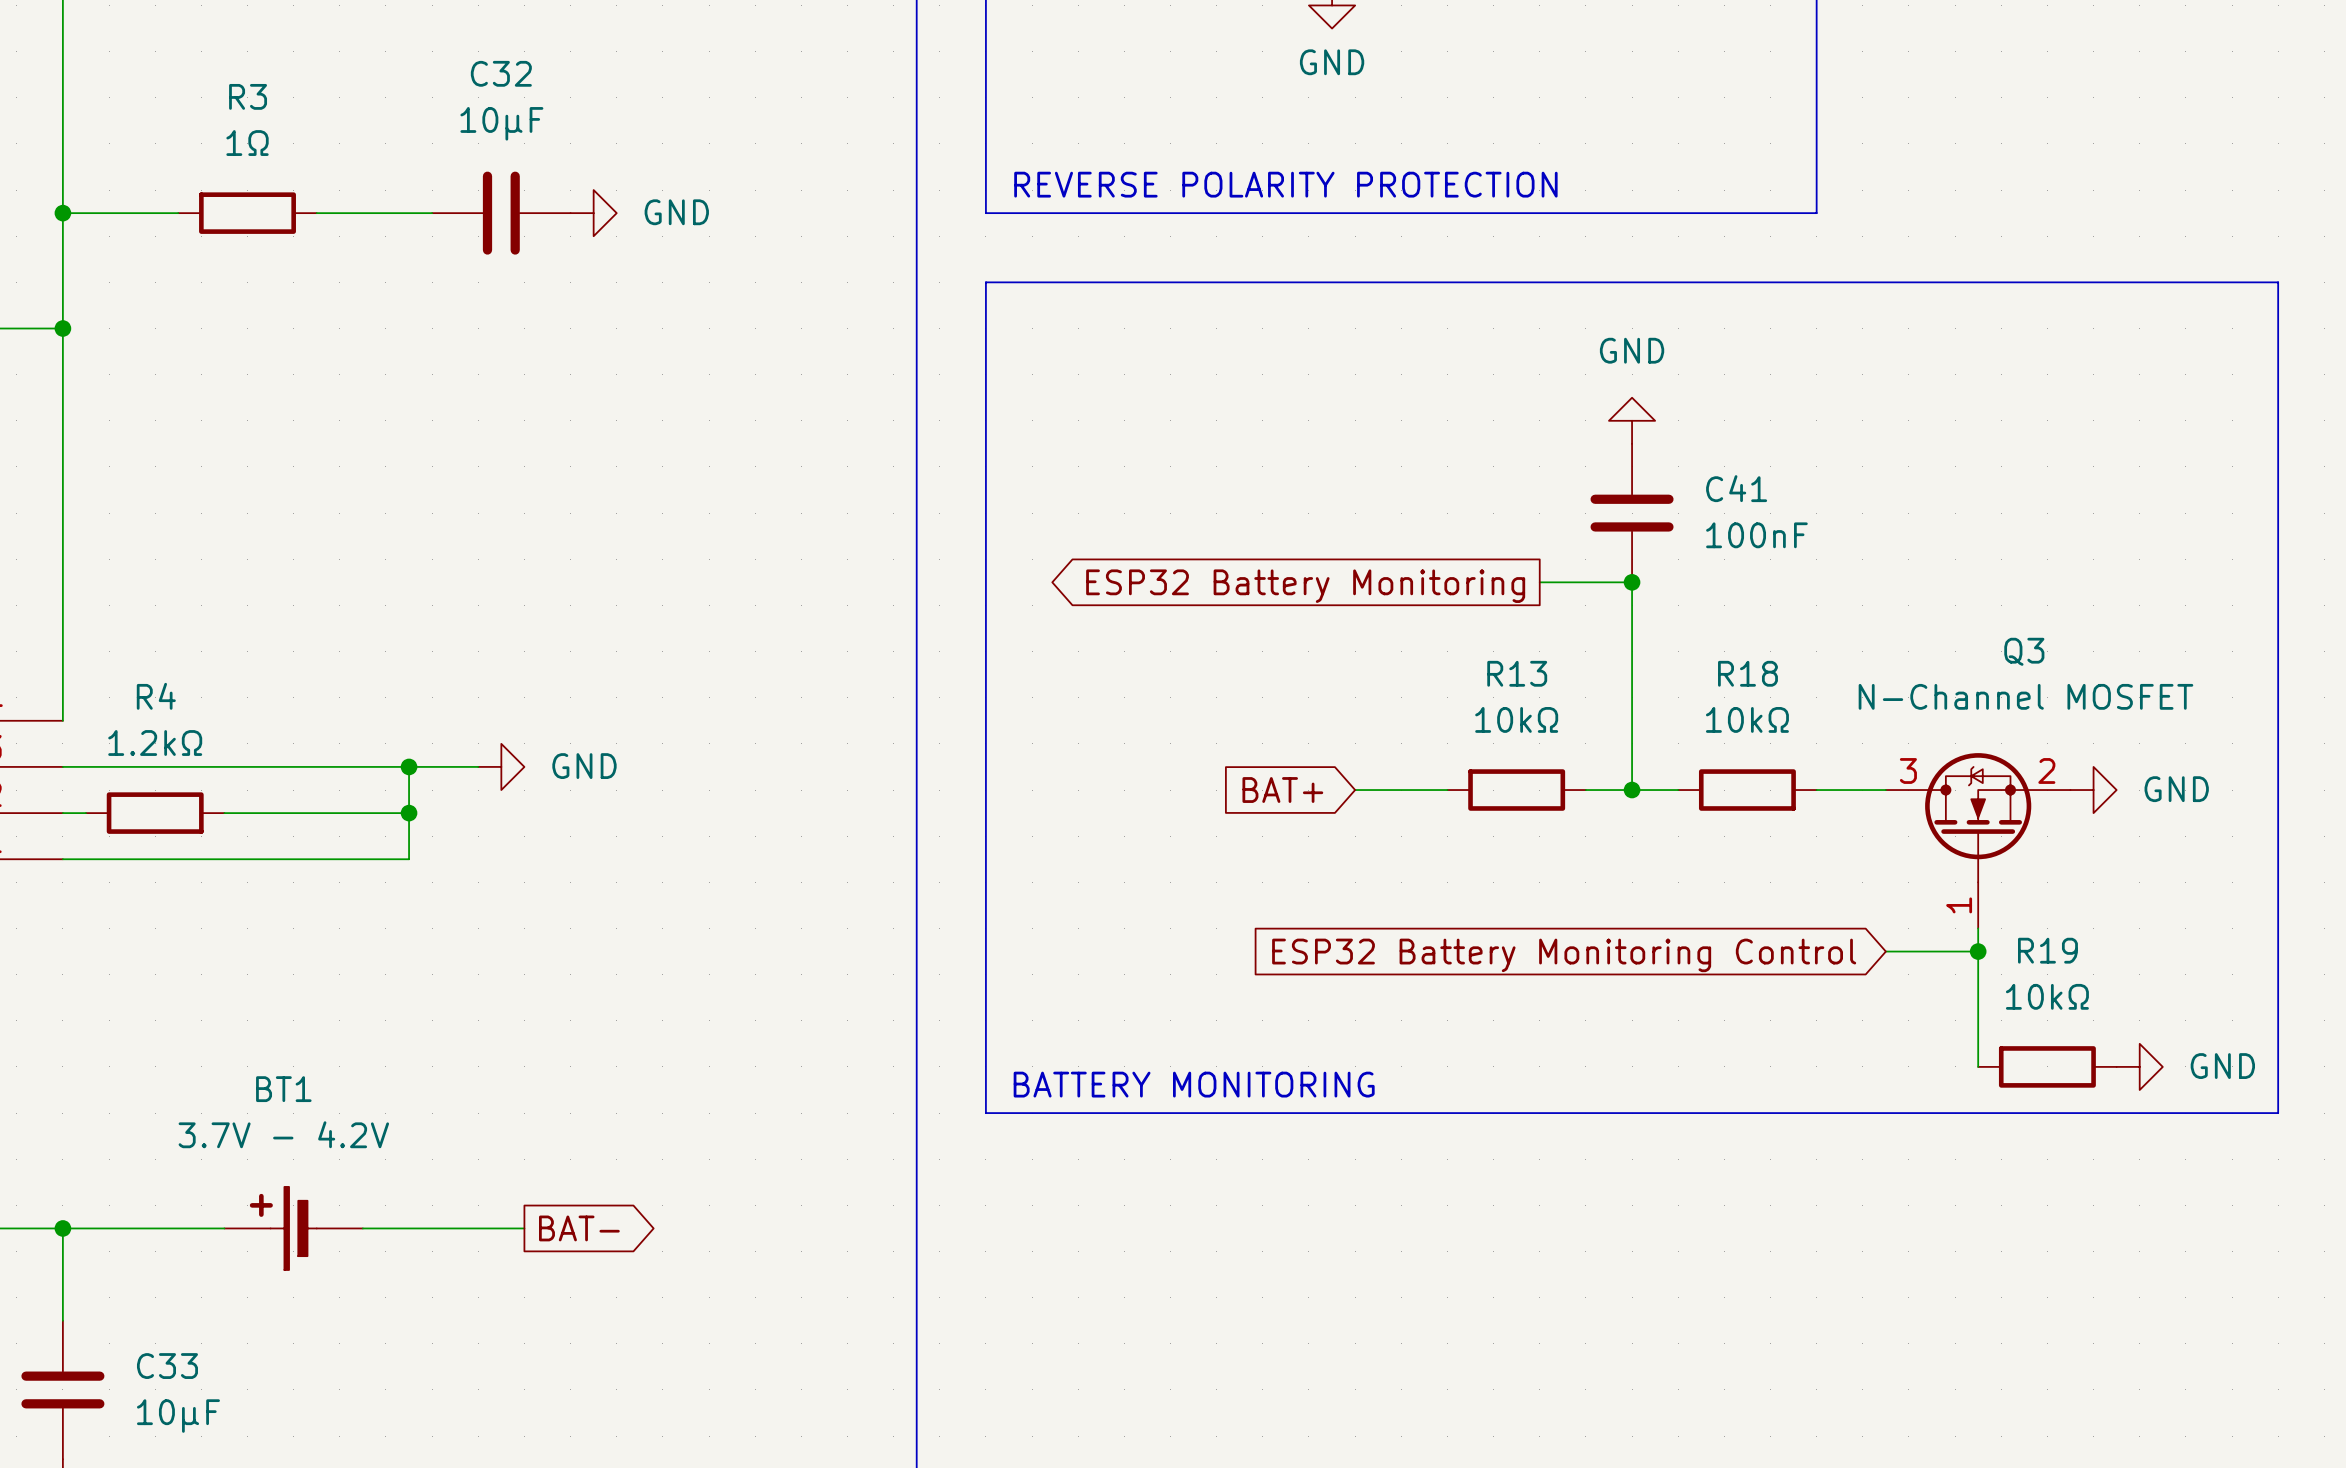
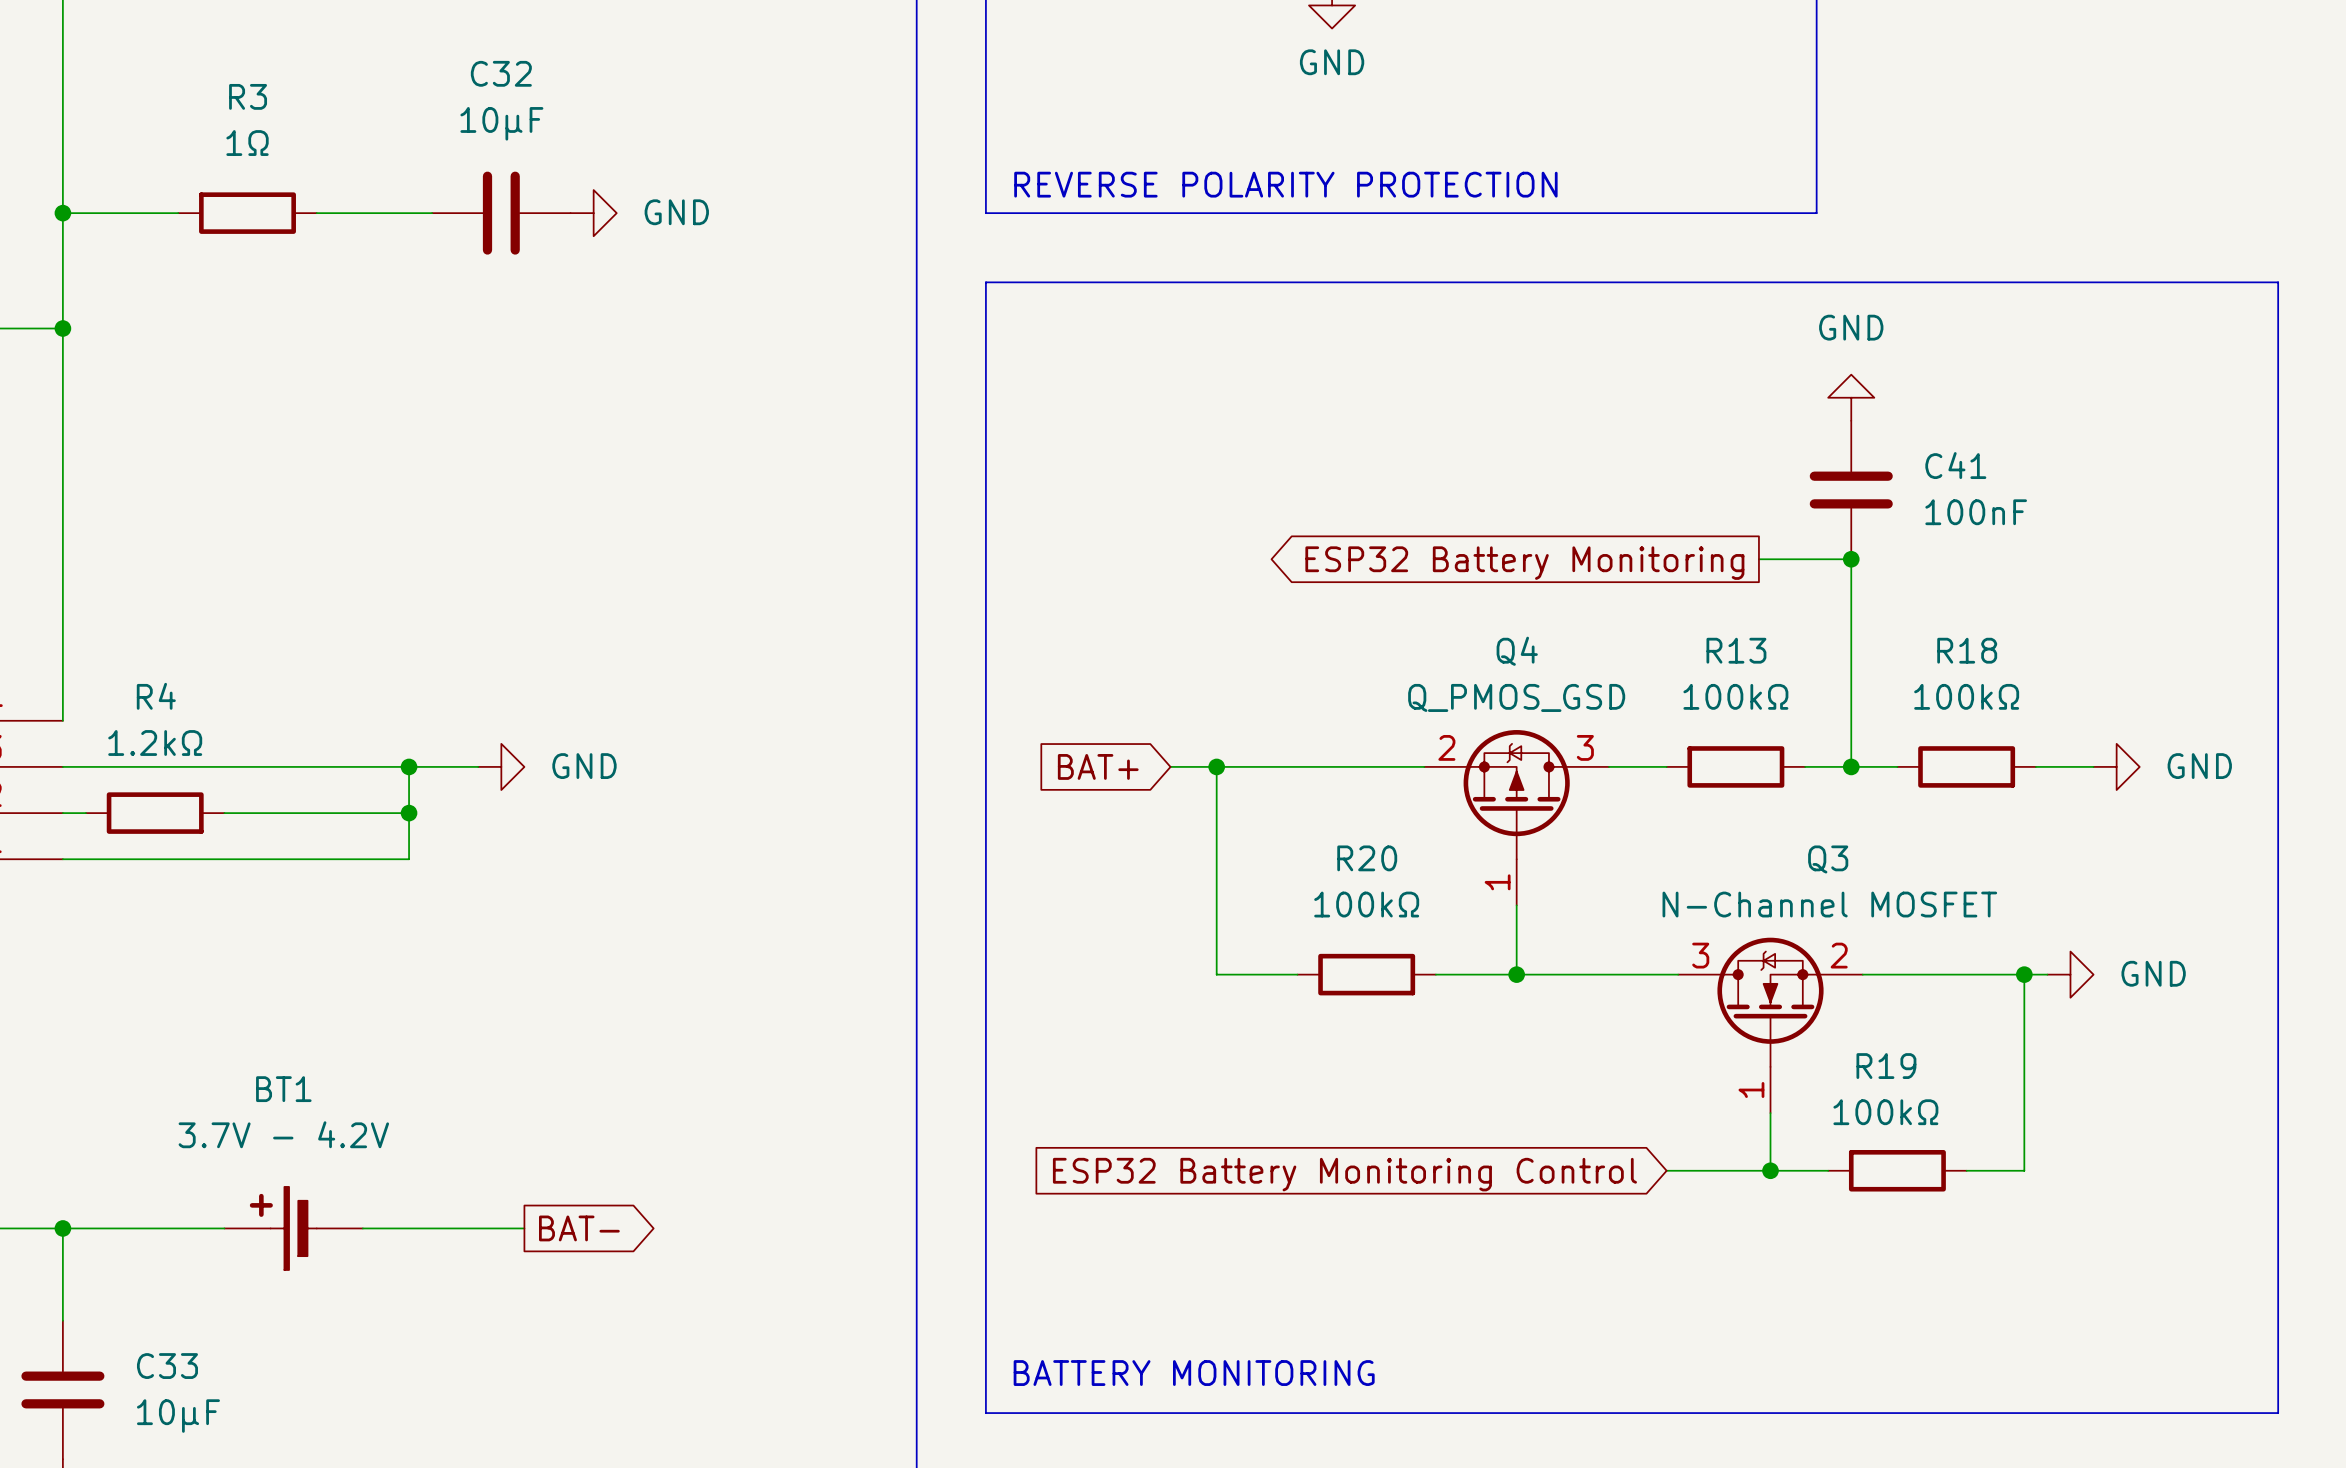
power symbol position: GND (1632, 420) -> GND (1851, 397)
C41 position: (1632, 513) -> (1851, 490)
junction: none -> (1851, 559)
wire: (1539, 582) (1632, 582) (1632, 790) -> (1758, 559) (1851, 559) (1851, 766)
junction: (1632, 582) -> none
global label position: ESP32 Battery Monitoring (1305, 586) -> ESP32 Battery Monitoring (1524, 563)
Q3 name position: Q3 (2024, 651) -> Q3 (1828, 859)
Q3 value position: N-Channel MOSFET (2025, 696) -> N-Channel MOSFET (1829, 904)
R13 value: 10kΩ (1516, 719) -> 100kΩ (1735, 696)
R18 value: 10kΩ (1747, 719) -> 100kΩ (1966, 696)
wire: none -> (1170, 766) (1424, 766)
wire: none -> (1216, 766) (1216, 974) (1297, 974)
junction: none -> (1216, 766)
wire: none -> (1608, 766) (1666, 766)
junction: none -> (1851, 766)
wire: none -> (2035, 766) (2093, 766)
global label position: BAT+ (1282, 790) -> BAT+ (1098, 766)
wire: (1355, 790) (1447, 790) -> none
R13 position: (1516, 790) -> (1735, 766)
wire: (1585, 790) (1678, 790) -> (1805, 766) (1897, 766)
junction: (1632, 790) -> none
R18 position: (1747, 790) -> (1966, 766)
wire: (1816, 790) (1885, 790) -> none
power symbol position: GND (2093, 790) -> GND (2116, 766)
Q4: none -> Q_PMOS_GSD (1516, 817)
Q3 position: (1978, 840) -> (1770, 1025)
wire: none -> (1516, 905) (1516, 974)
wire: (1978, 928) (1978, 1066) -> none
R19 name position: R19 (2047, 950) -> R19 (1886, 1066)
wire: (1885, 951) (1978, 951) -> none
junction position: (1978, 951) -> (2024, 974)
global label position: ESP32 Battery Monitoring Control (1564, 955) -> ESP32 Battery Monitoring Control (1344, 1174)
R20: none -> 100kΩ (1366, 974)
junction: none -> (1516, 974)
wire: none -> (1862, 974) (2047, 974)
wire: none -> (2024, 974) (2024, 1170) (1966, 1170)
power symbol: none -> GND (2070, 974)
R19 value: 10kΩ (2047, 996) -> 100kΩ (1885, 1112)
R19 position: (2047, 1066) -> (1897, 1170)
power symbol: GND (2139, 1066) -> none
text position: BATTERY MONITORING (1194, 1084) -> BATTERY MONITORING (1194, 1373)
line: (985, 1113) (2278, 1113) -> (985, 1113) (985, 1413) (2278, 1413) (2278, 1113)
wire: none -> (1770, 1113) (1770, 1170)
wire: none -> (1666, 1170) (1828, 1170)
junction: none -> (1770, 1170)

